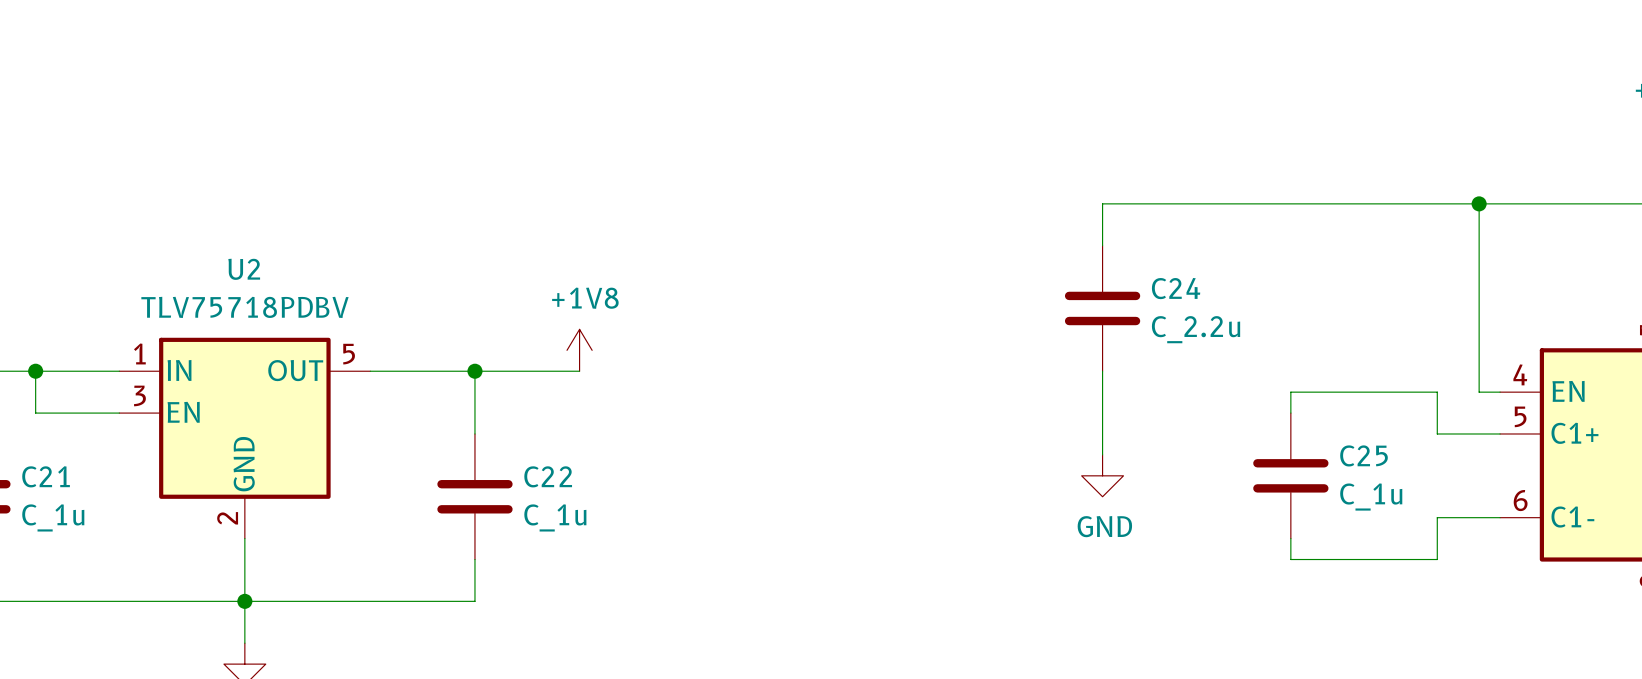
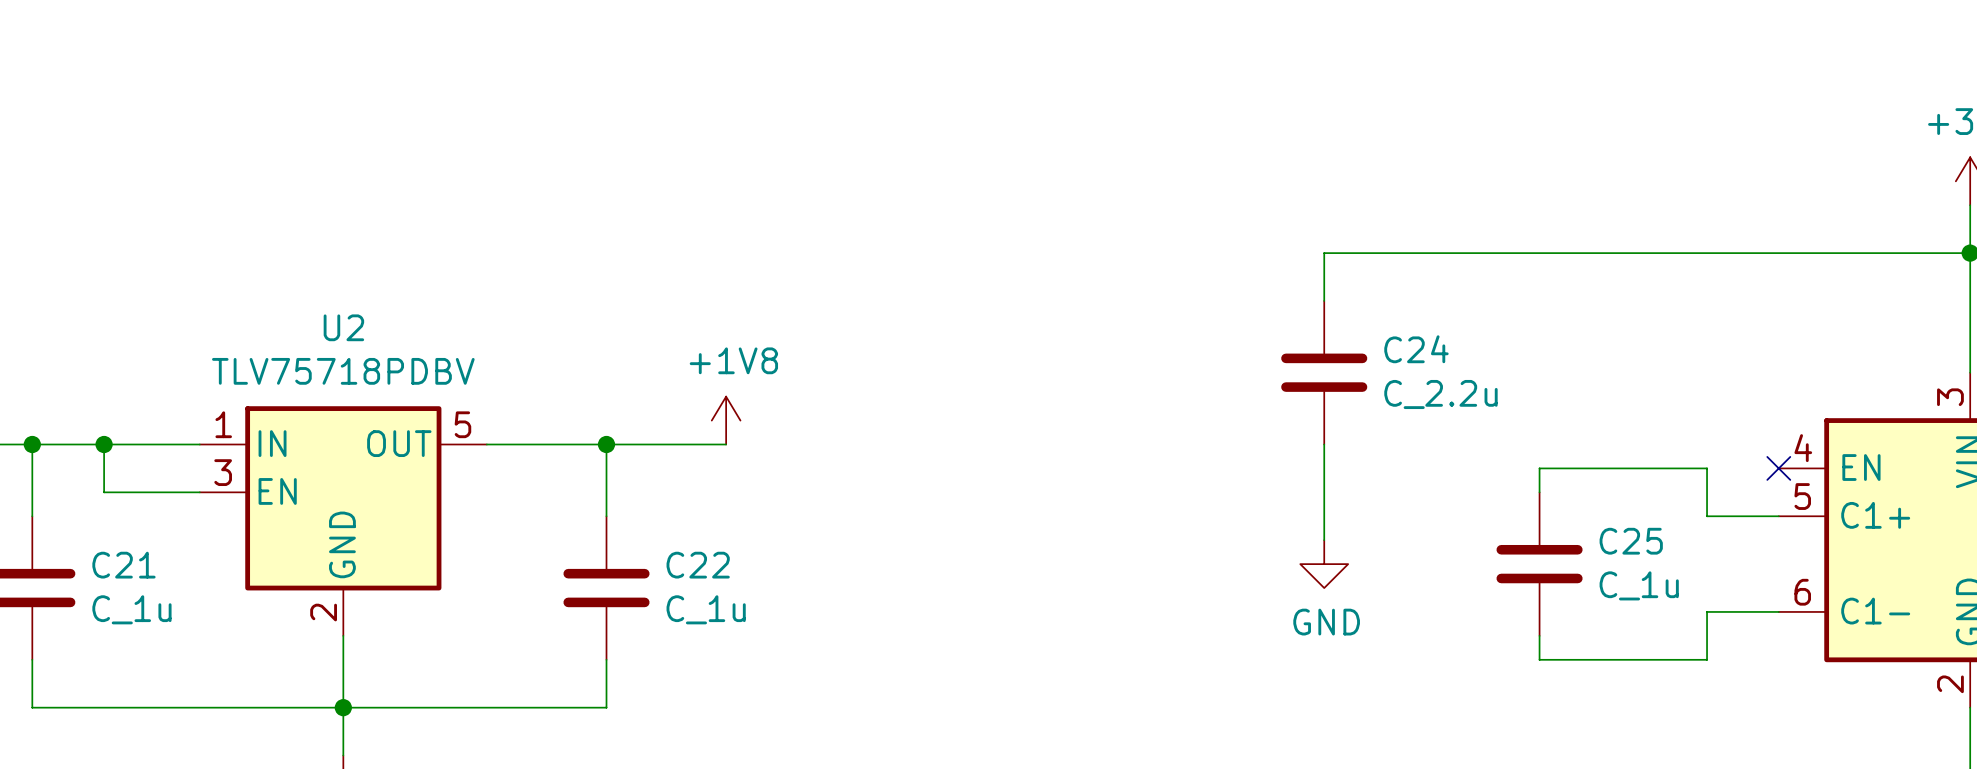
wire: (1479, 203) (1479, 392) (1500, 392) -> none
junction: (1479, 203) -> none
no-connect mark: none -> (1778, 468)

